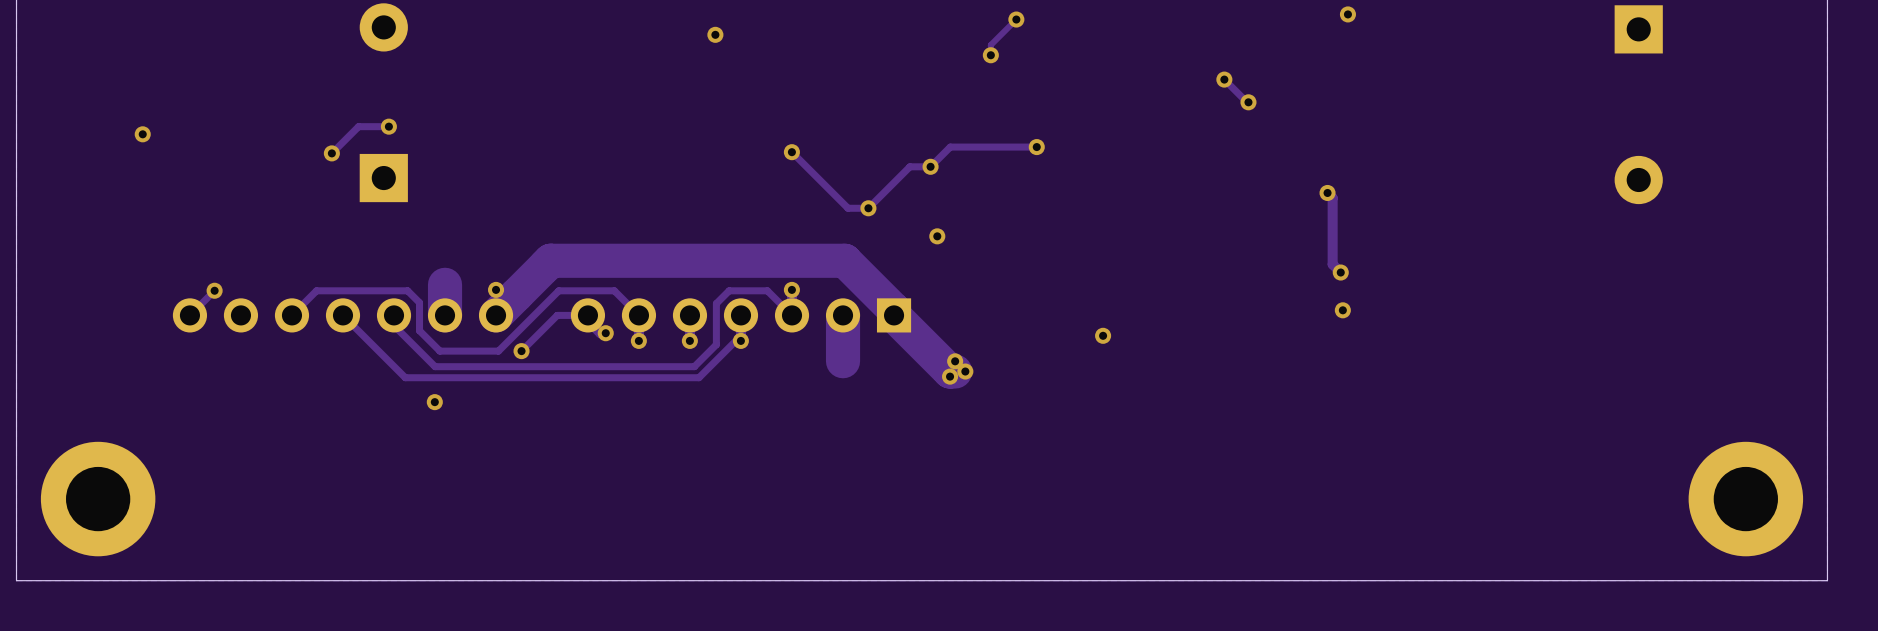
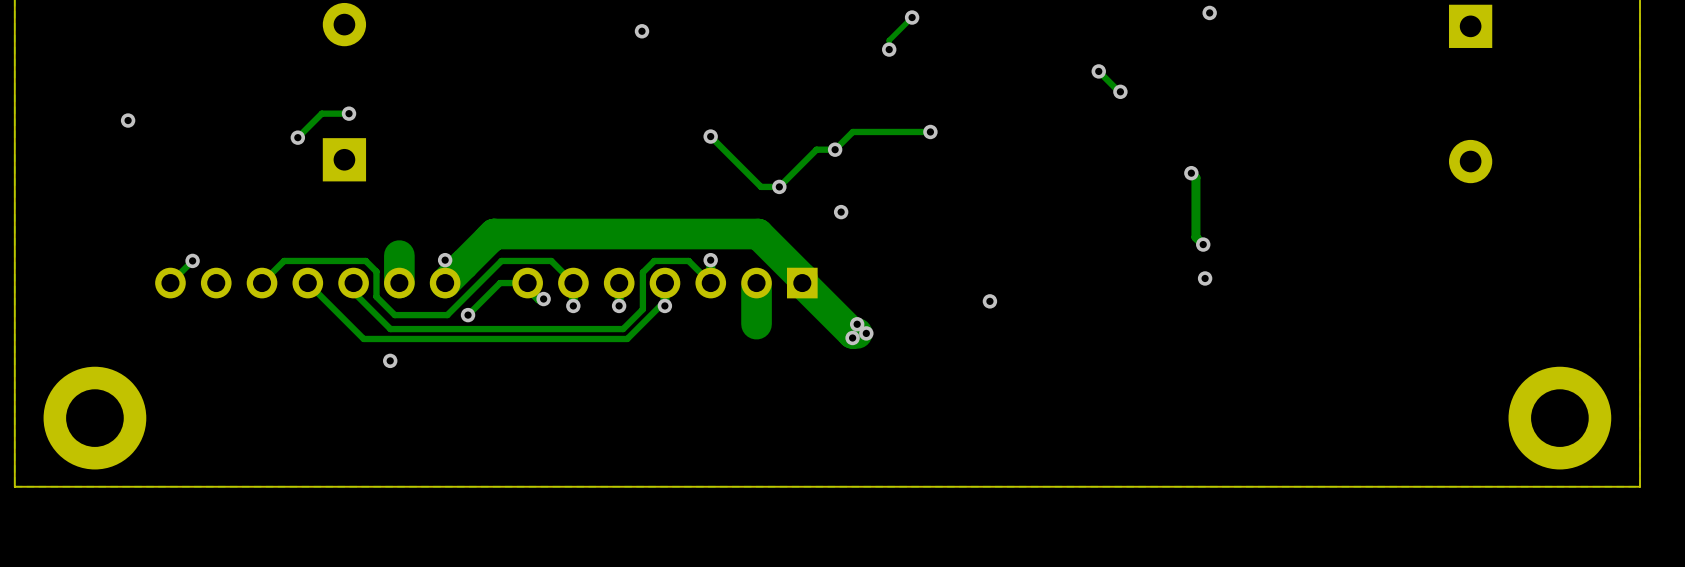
part position: (98, 499) -> (94, 418)
part position: (1745, 499) -> (1559, 418)
board edge: (1827, 542) (1827, 580) (16, 580) (16, 542) -> (1640, 486) (14, 486)

